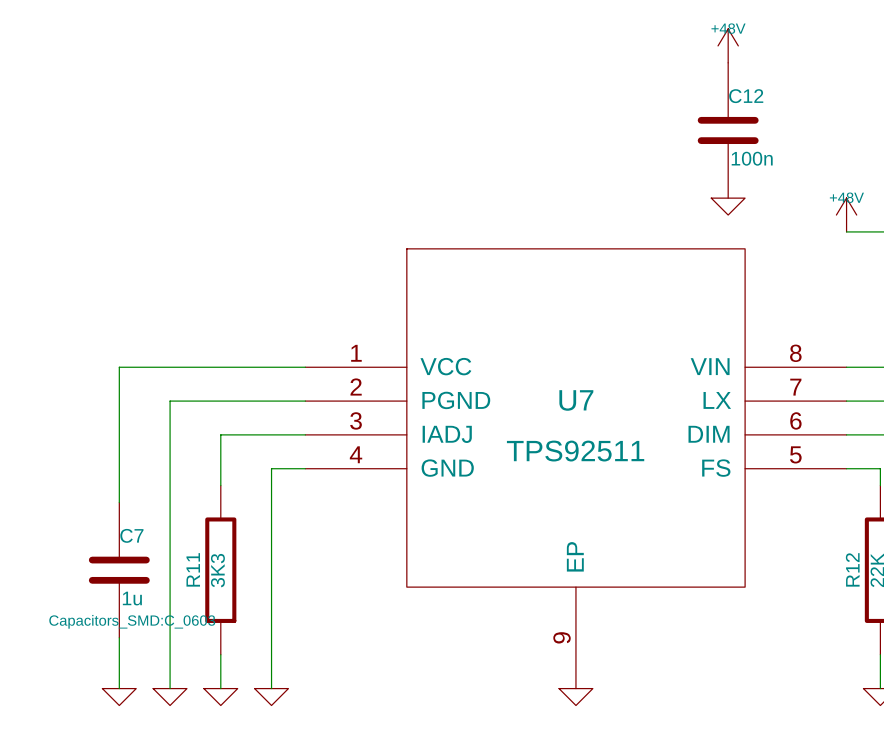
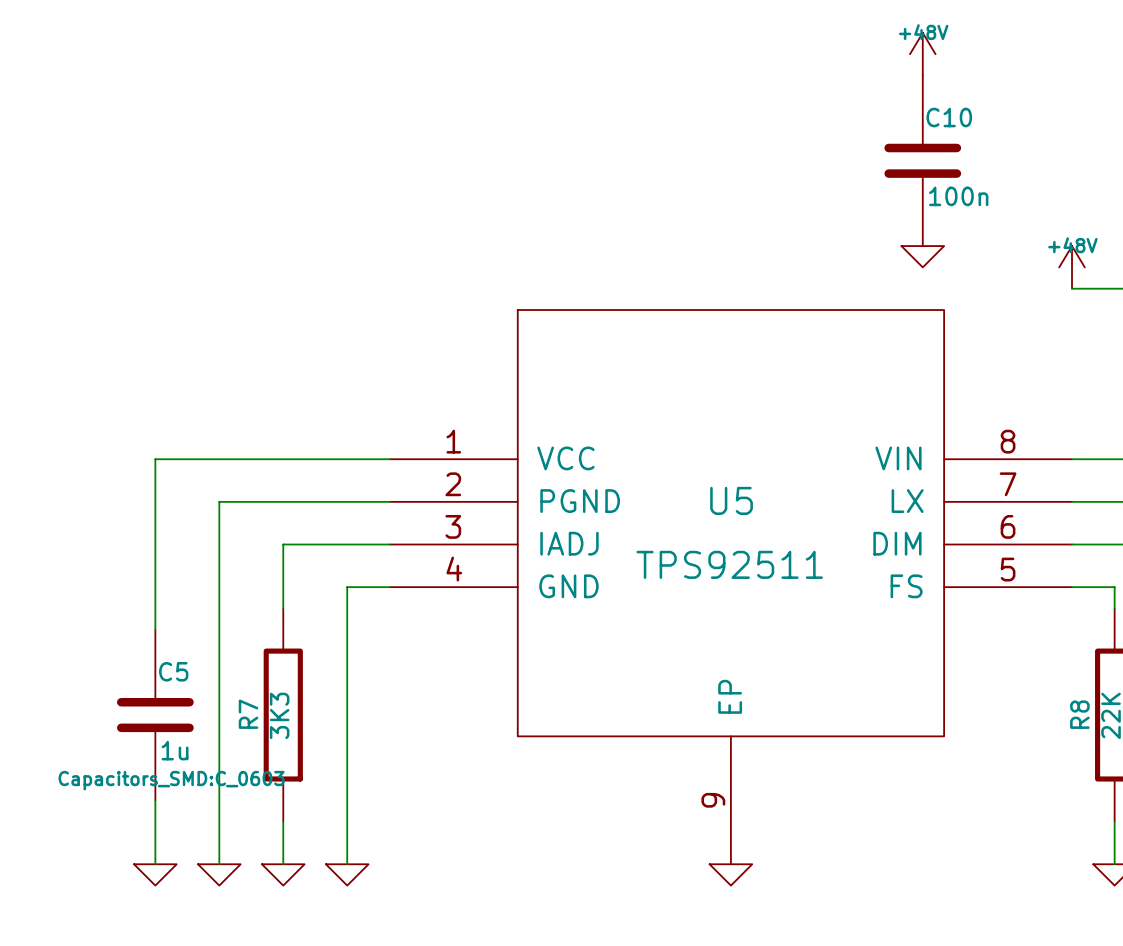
C12 name: C12 (746, 96) -> C10 (949, 117)
U7 name: U7 (576, 400) -> U5 (731, 500)
C7 name: C7 (131, 535) -> C5 (173, 671)
R11 name: R11 (193, 569) -> R7 (248, 714)
R12 name: R12 (852, 569) -> R8 (1079, 714)

